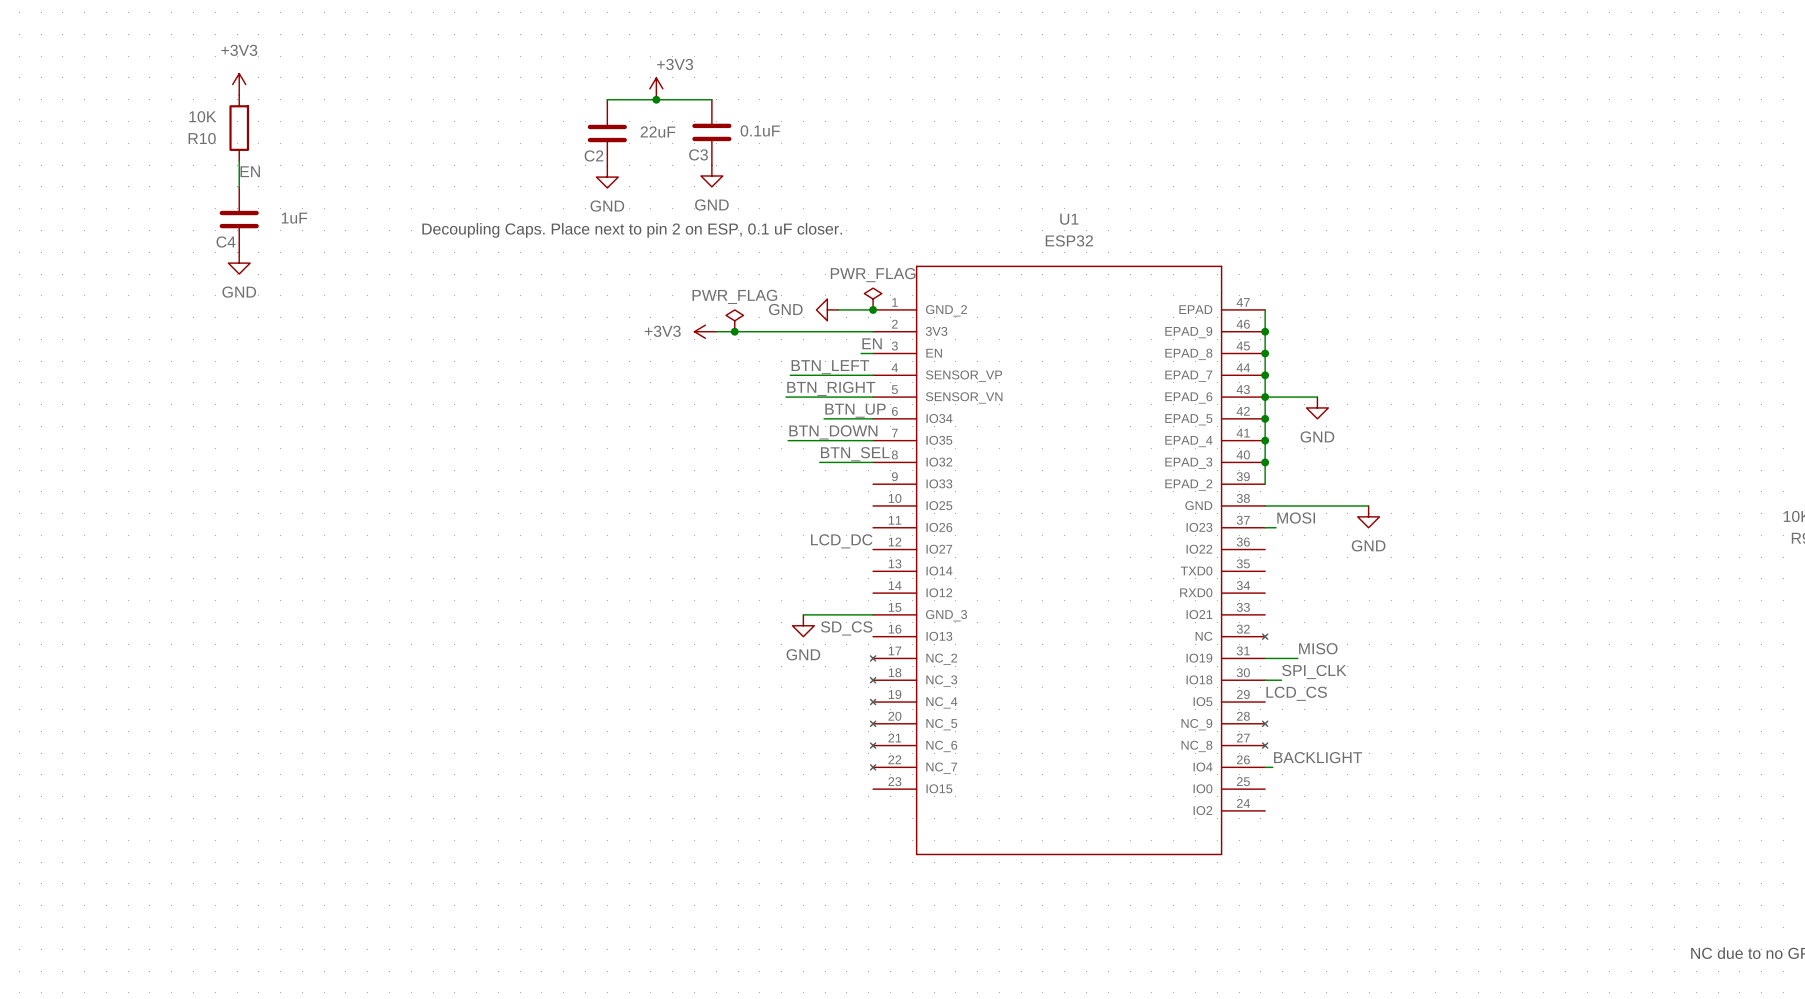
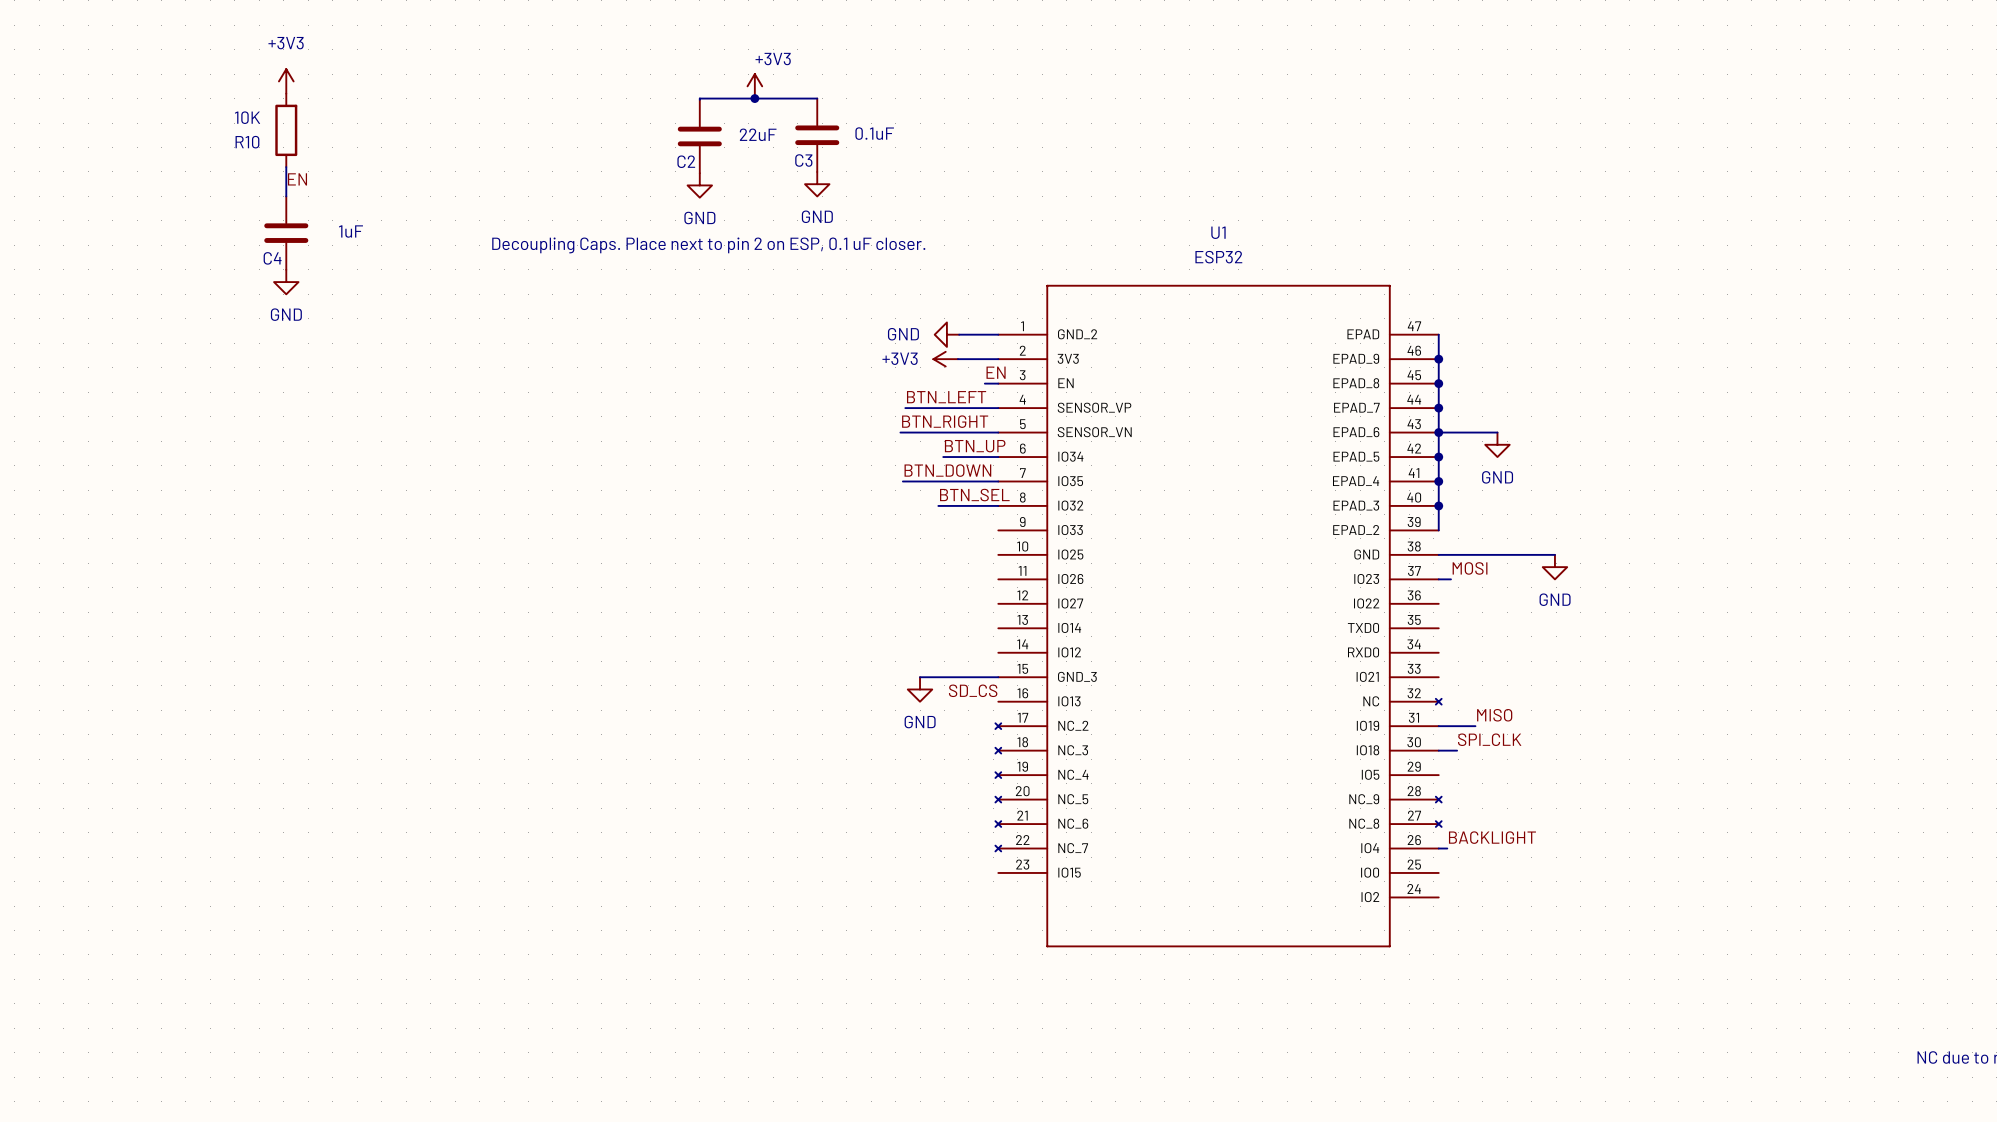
power symbol: PWR_FLAG (873, 299) -> none
junction: (873, 309) -> none
power symbol: PWR_FLAG (734, 320) -> none
power symbol position: +3V3 (705, 331) -> +3V3 (945, 359)
wire: (716, 331) (837, 331) -> none
junction: (734, 331) -> none
label: LCD_DC (841, 541) -> none
label: LCD_CS (1296, 693) -> none

